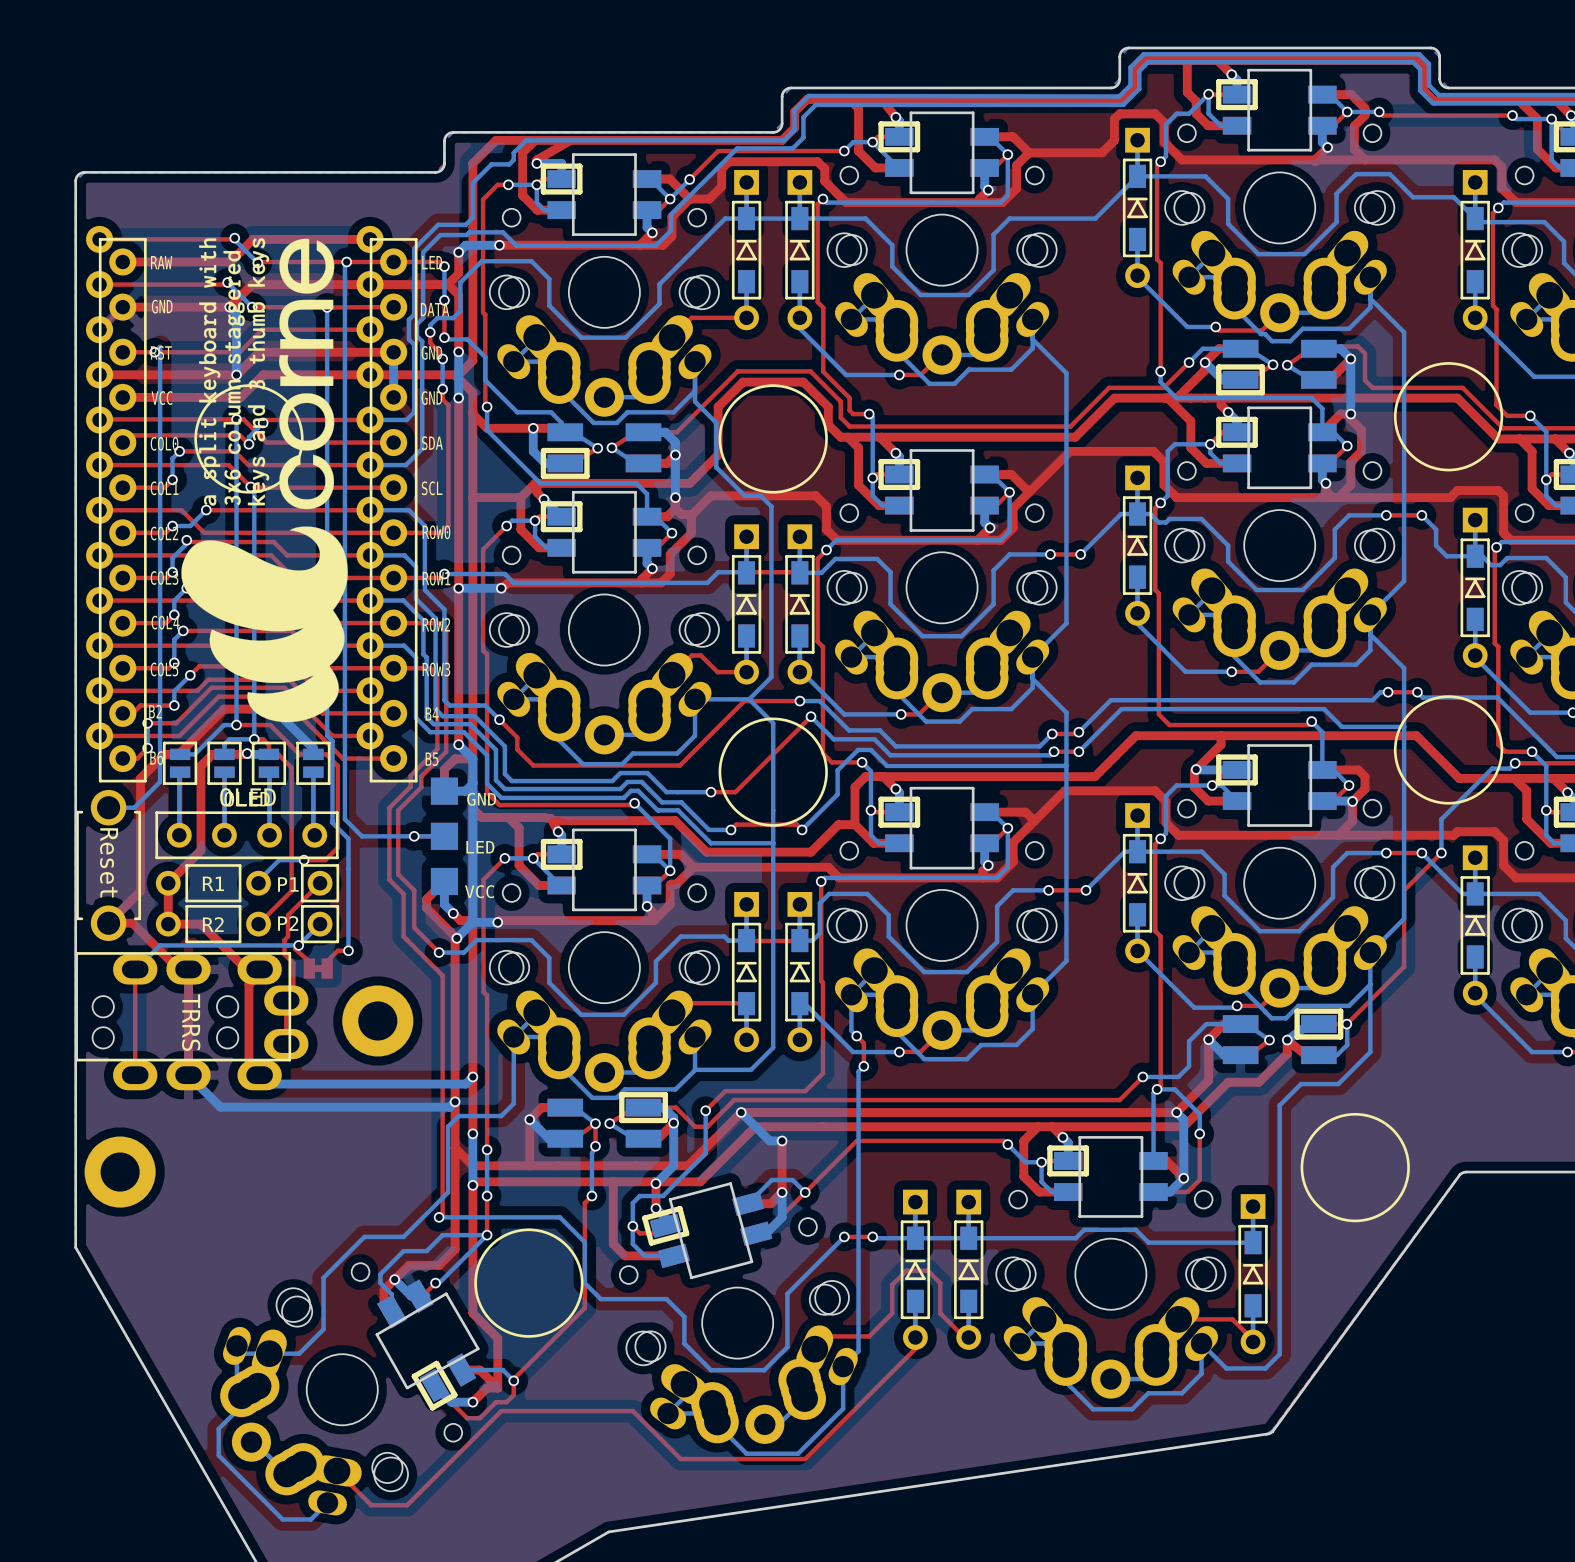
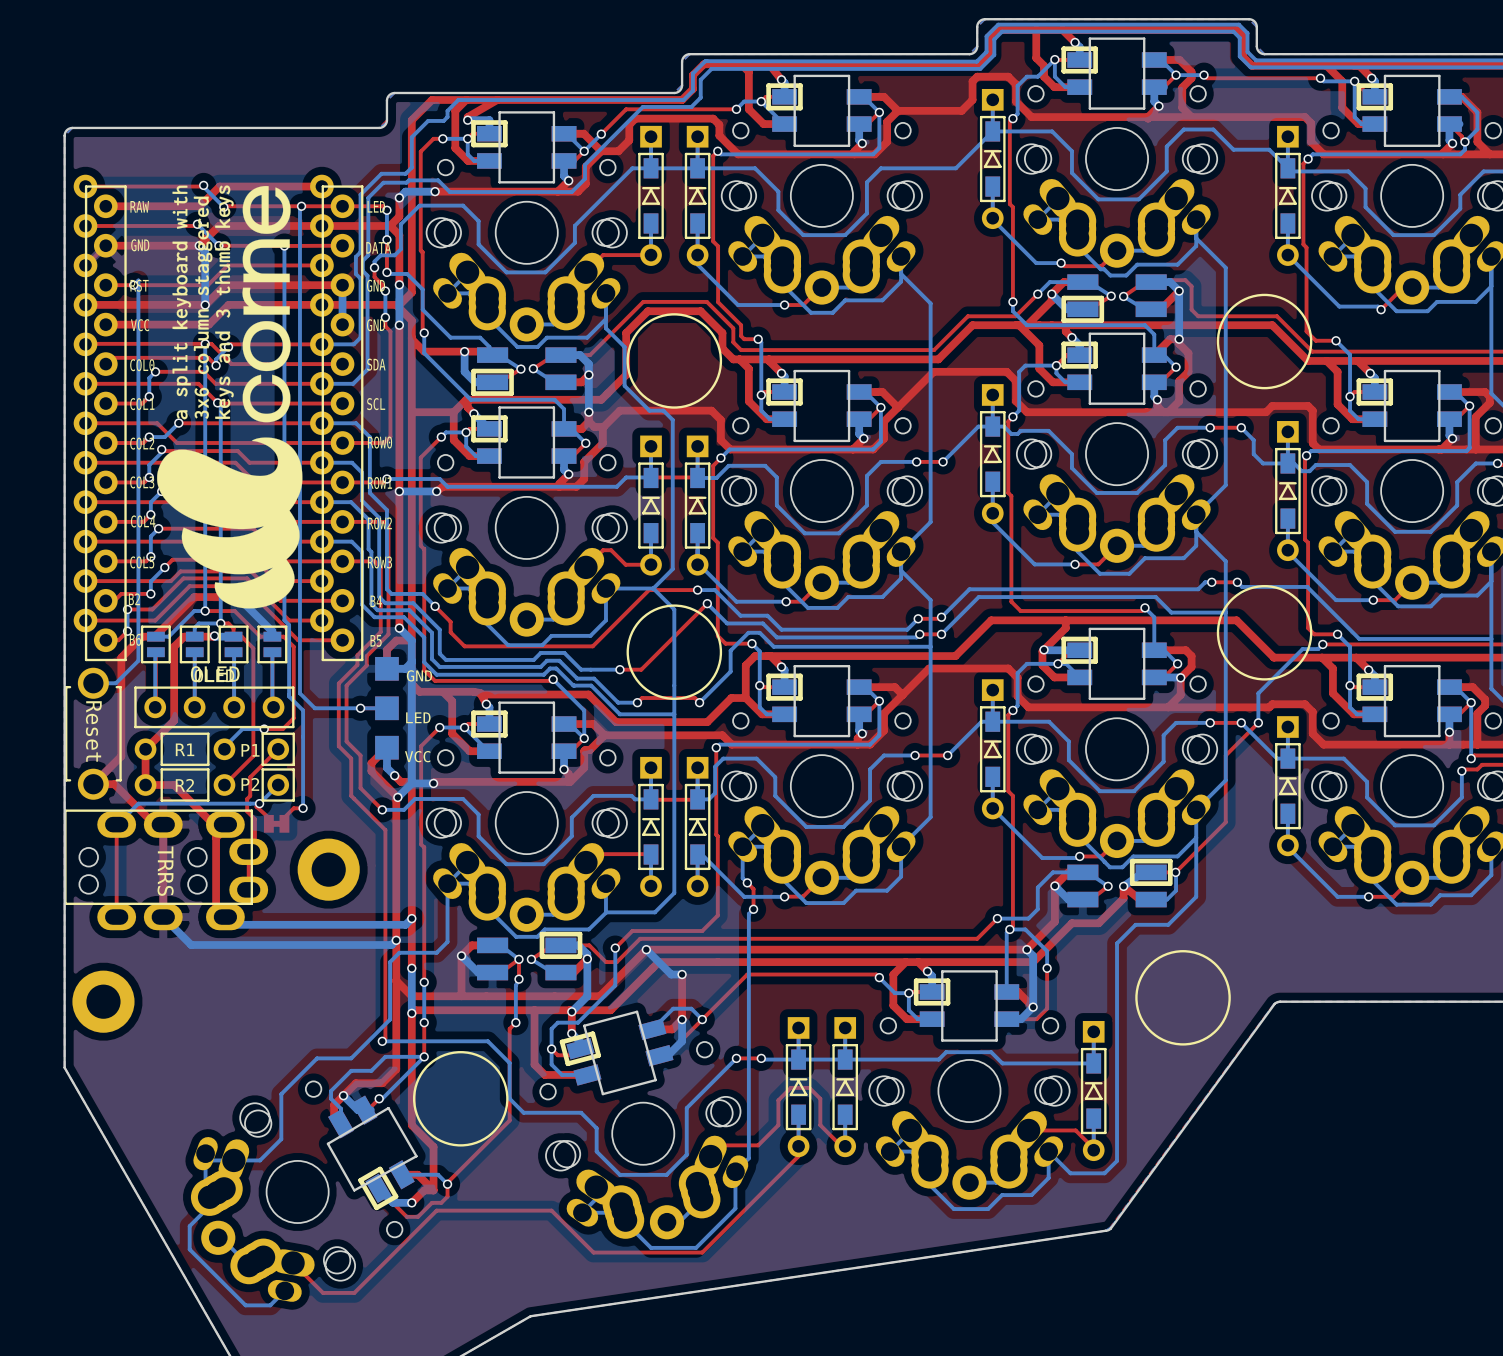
drawing: [194, 384, 304, 494] -> none

